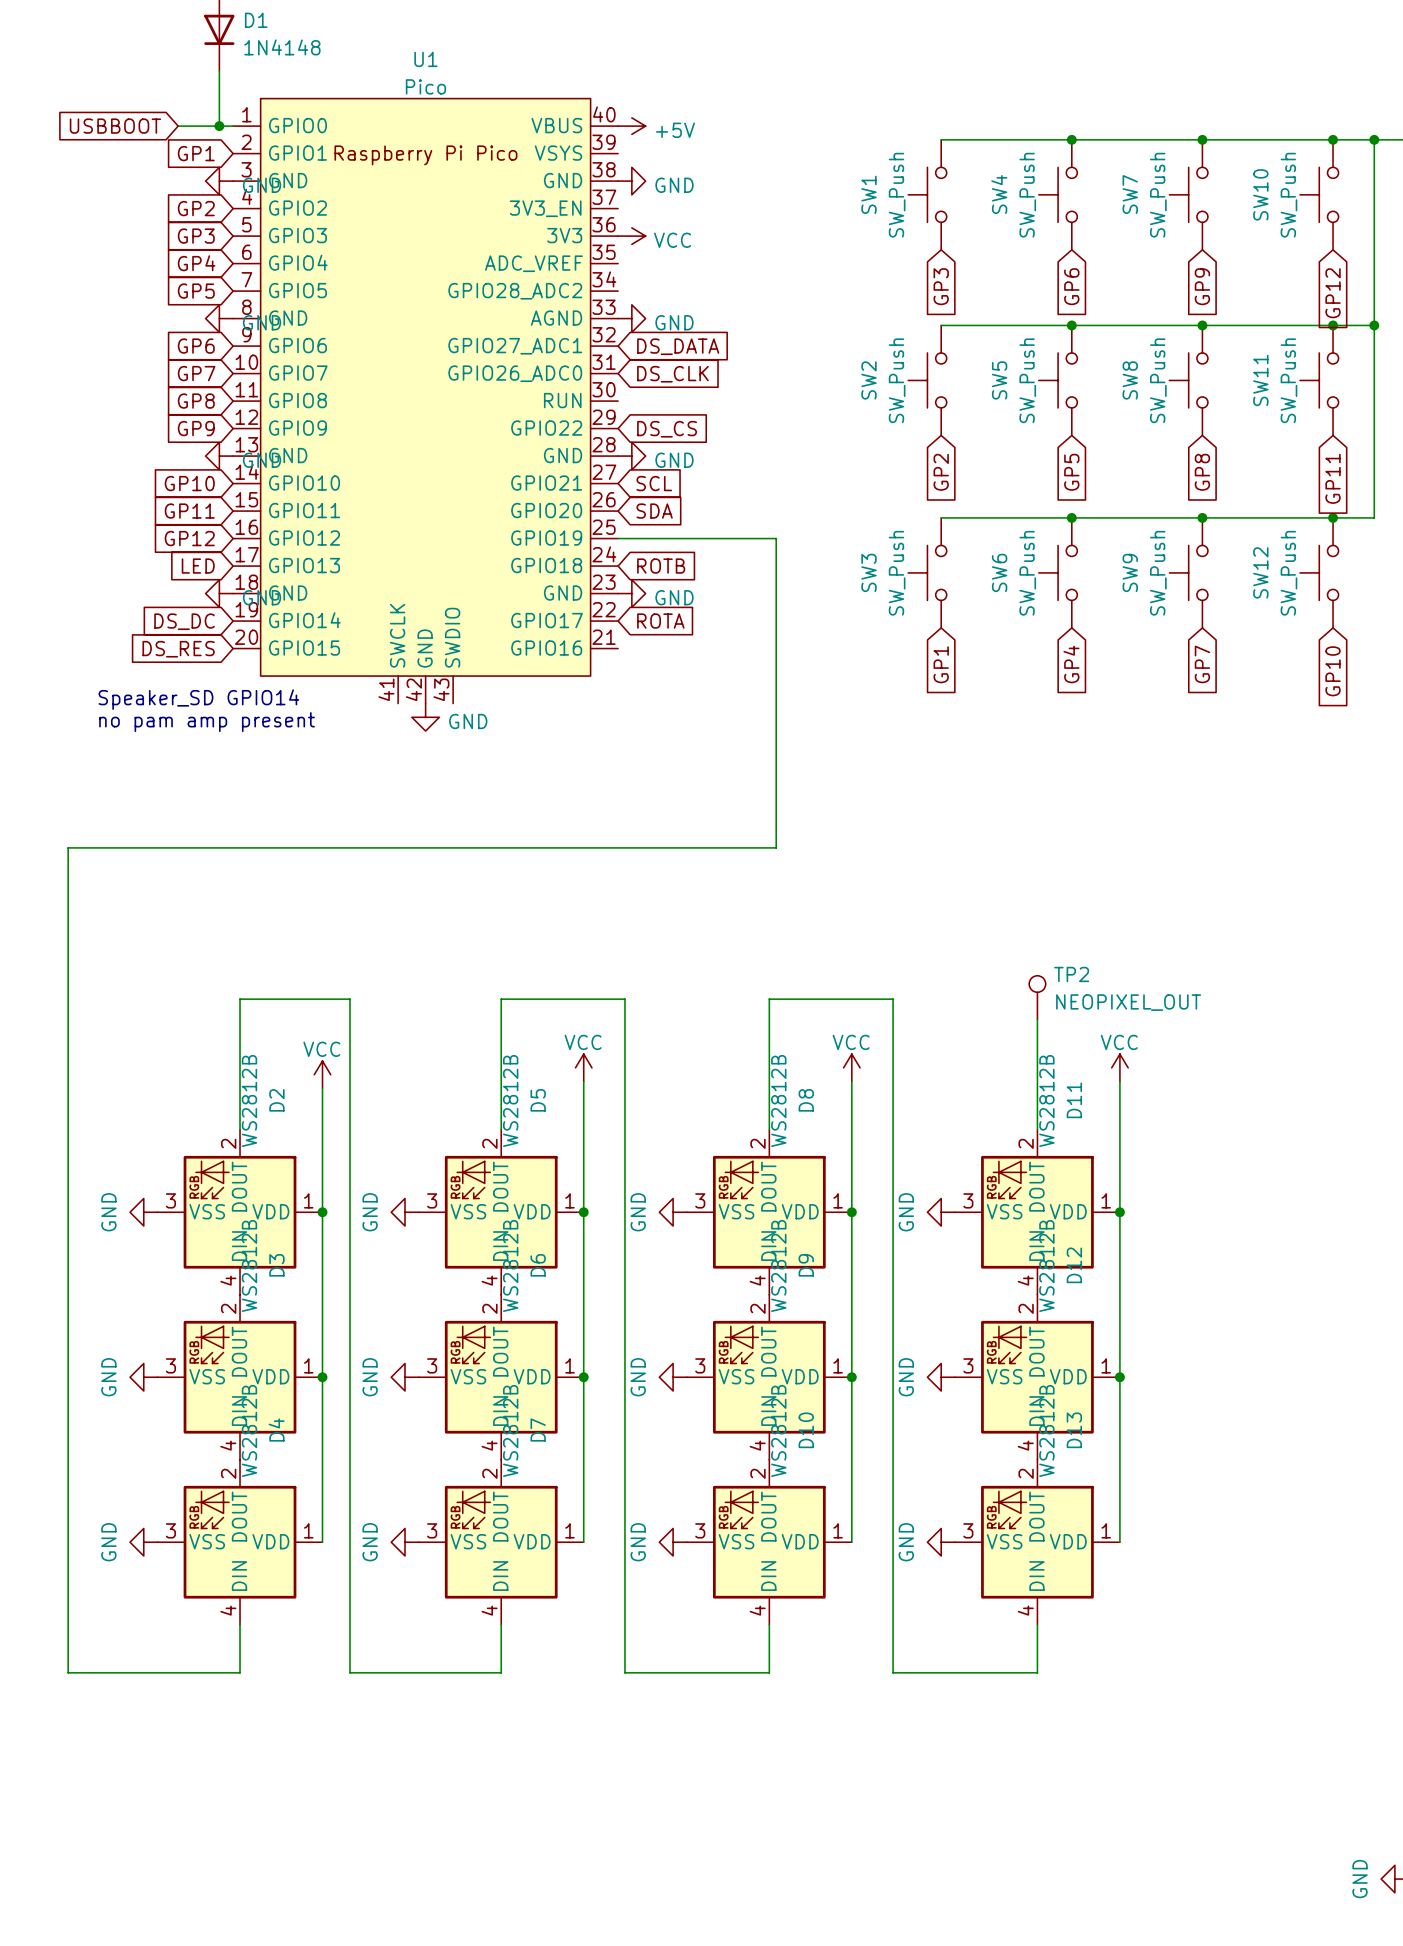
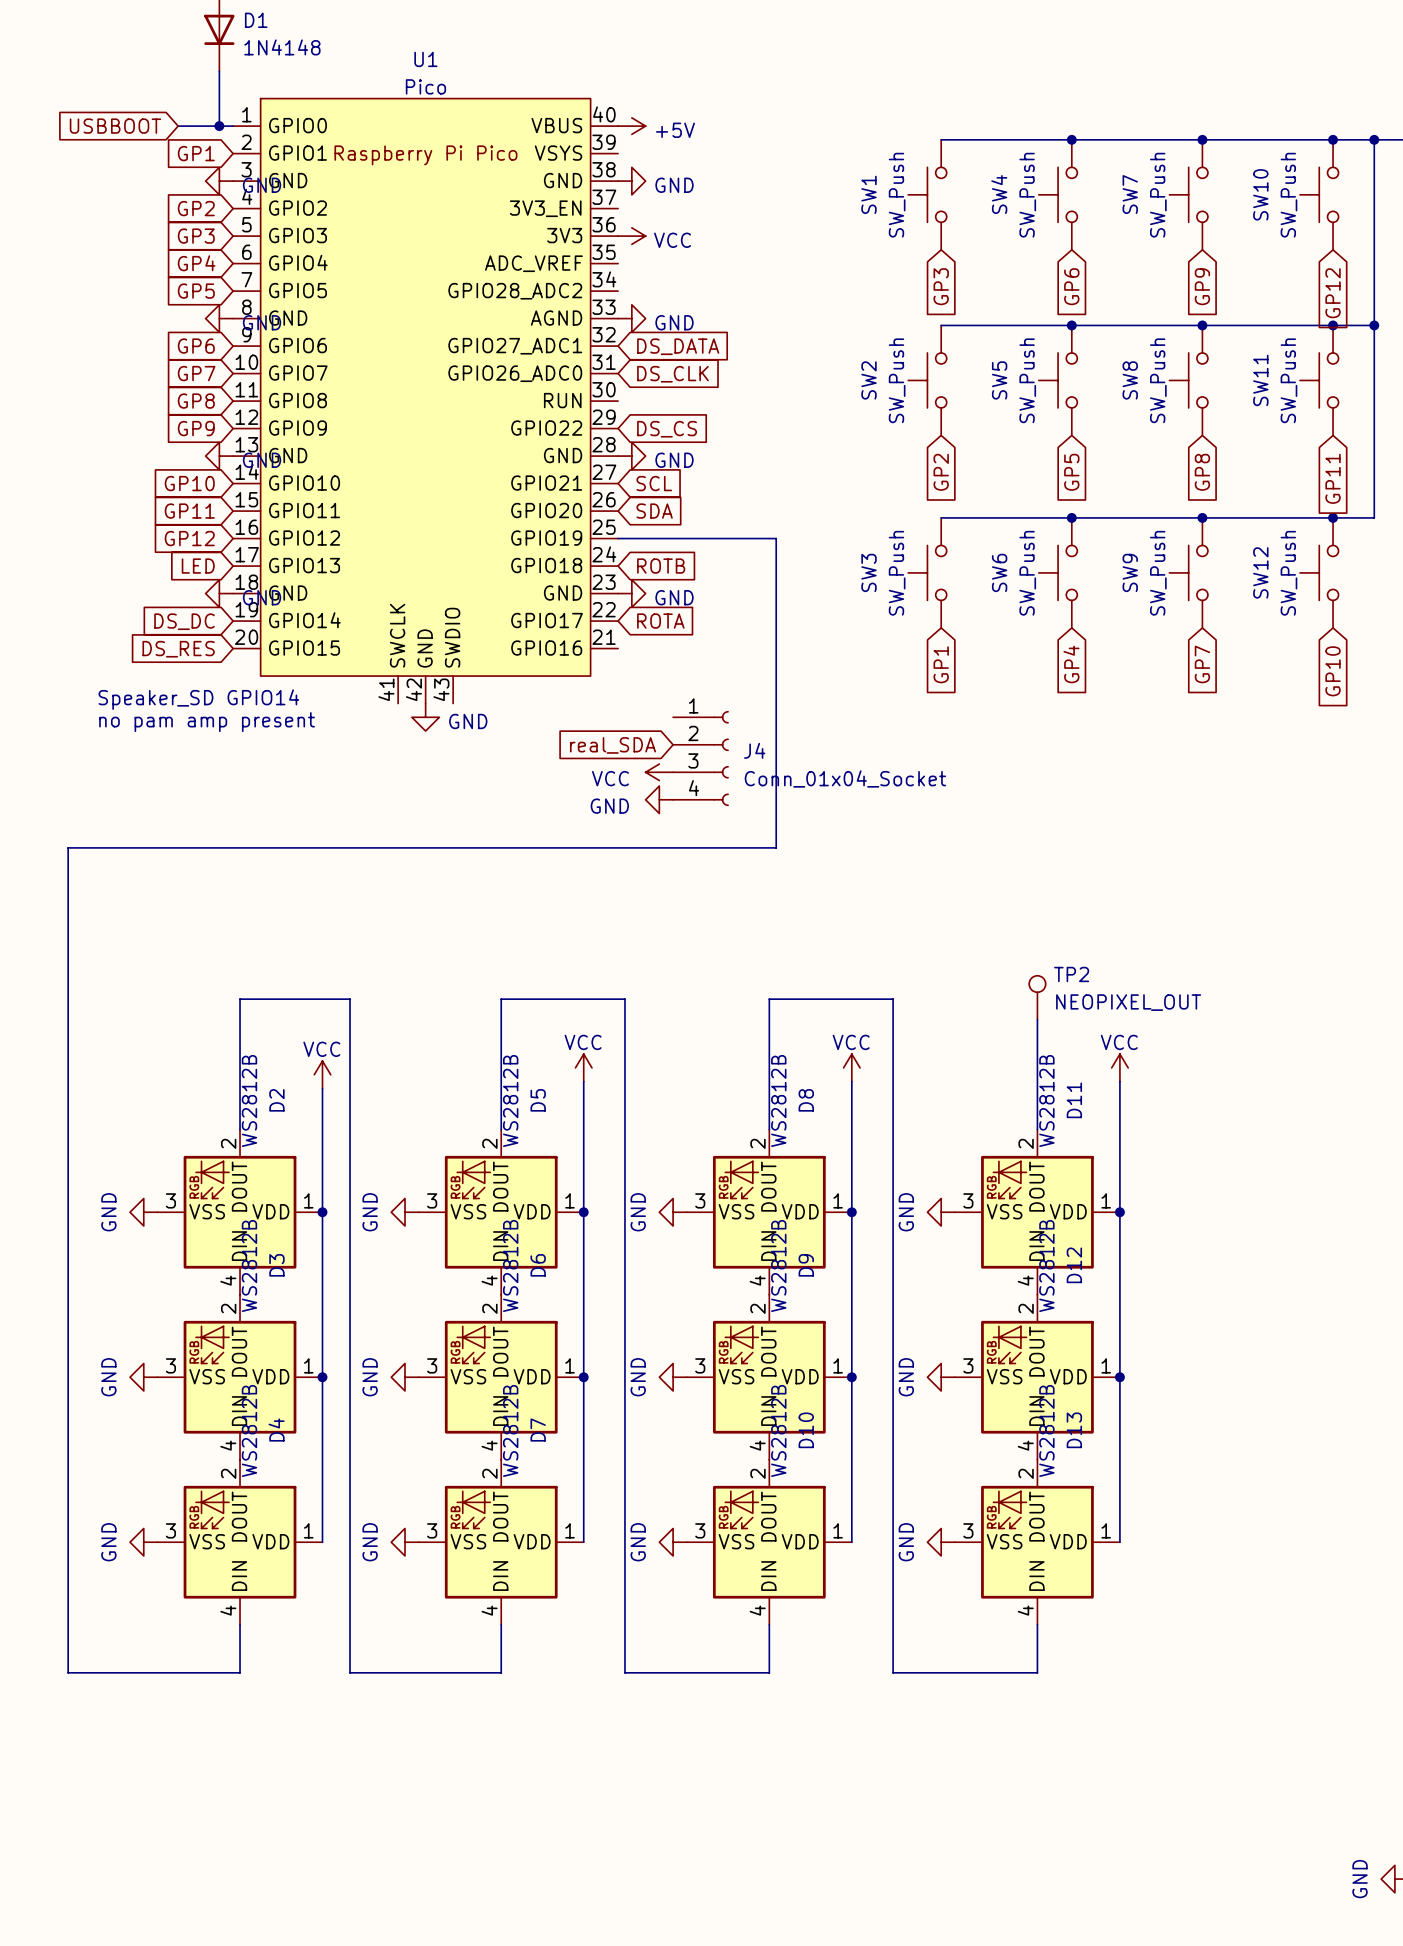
global label: none -> real_SDA (613, 745)
J4: none -> Conn_01x04_Socket (701, 758)
power symbol: none -> VCC (659, 772)
power symbol: none -> GND (659, 799)

